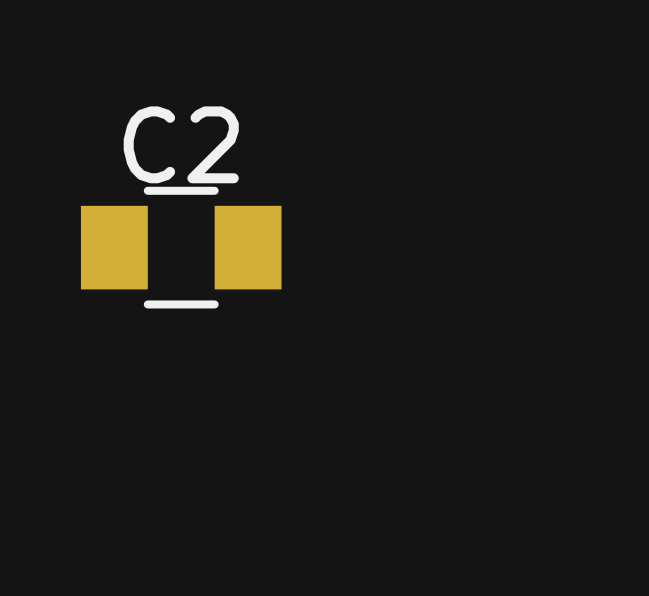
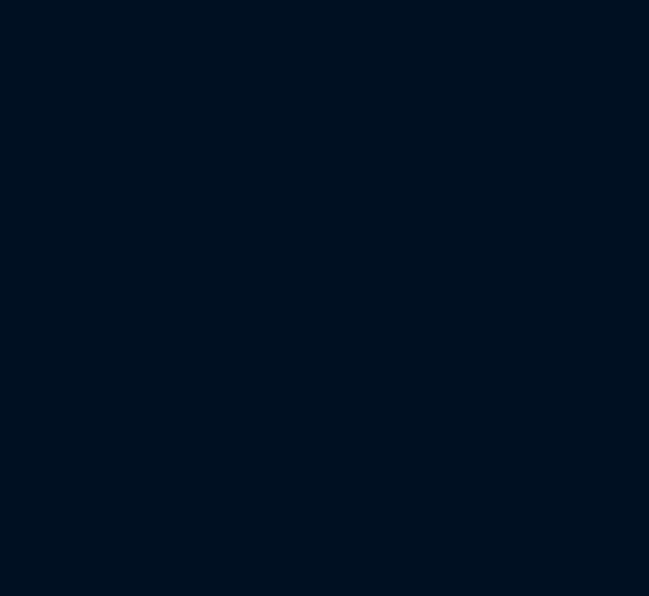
C2: (181, 247) -> none

